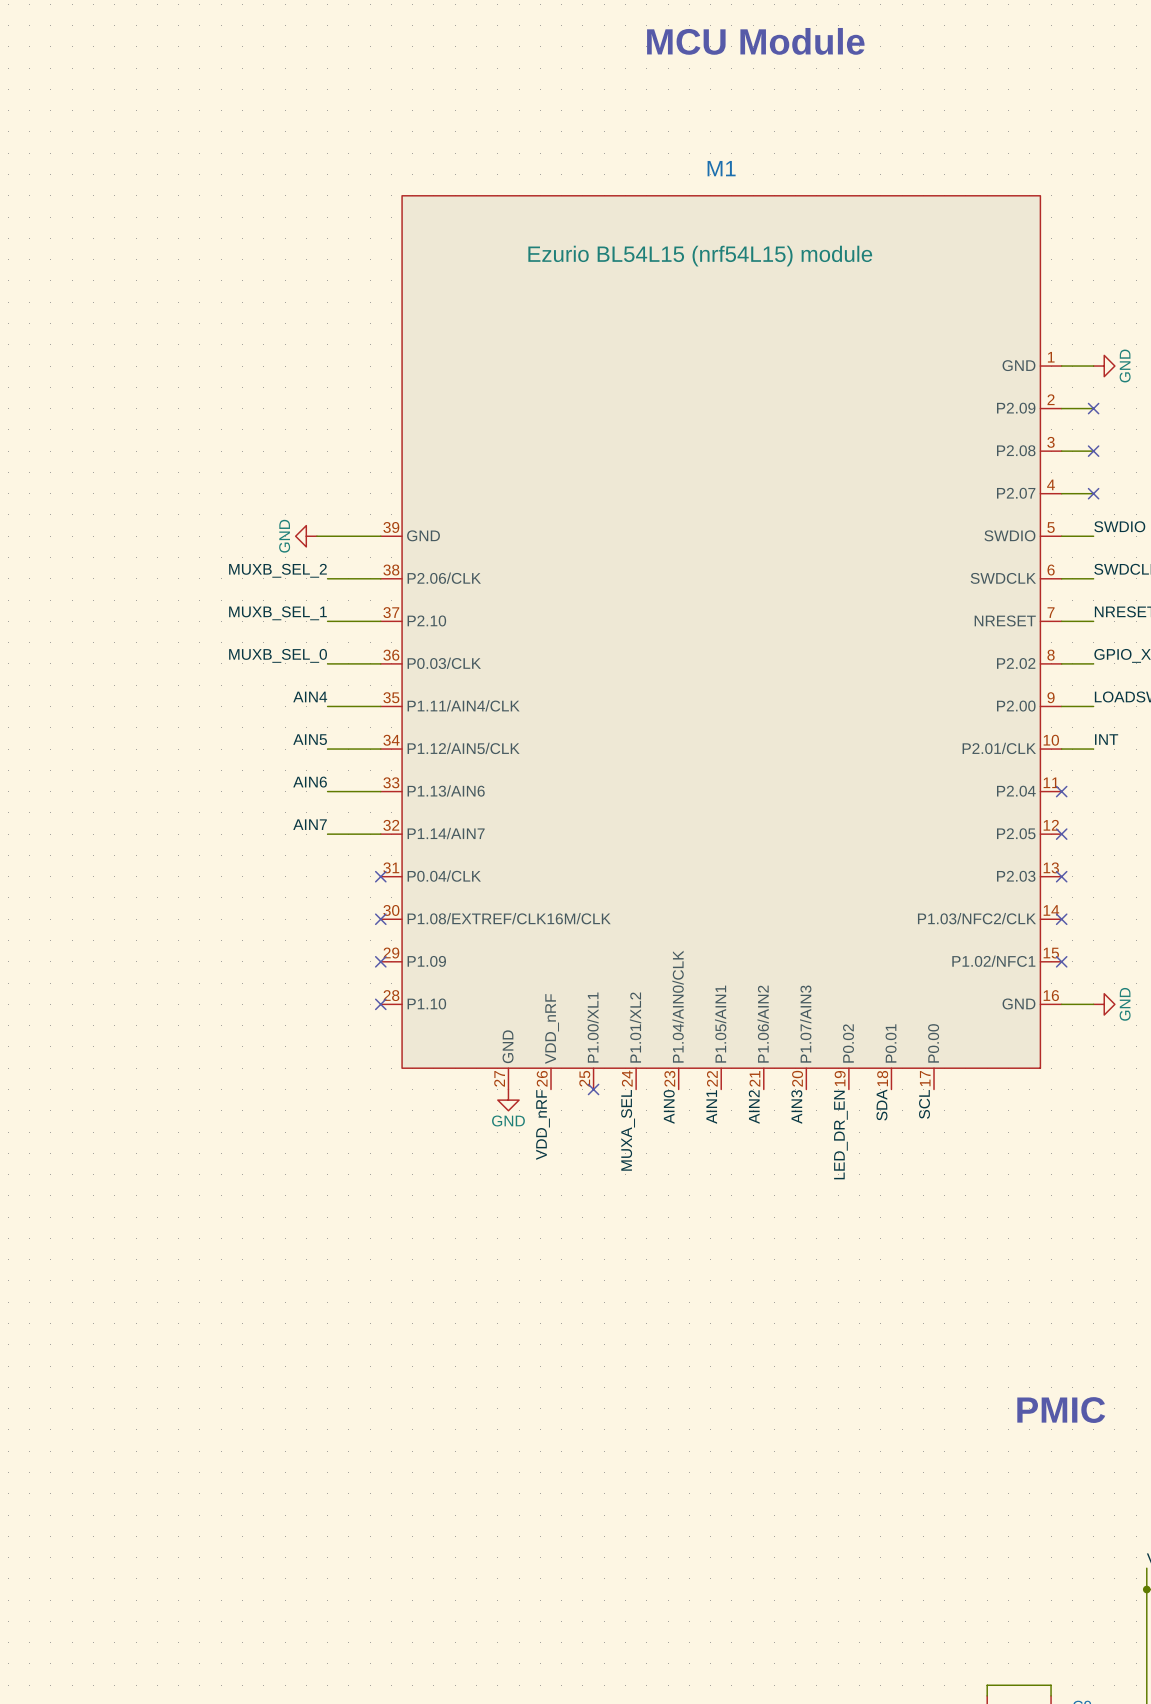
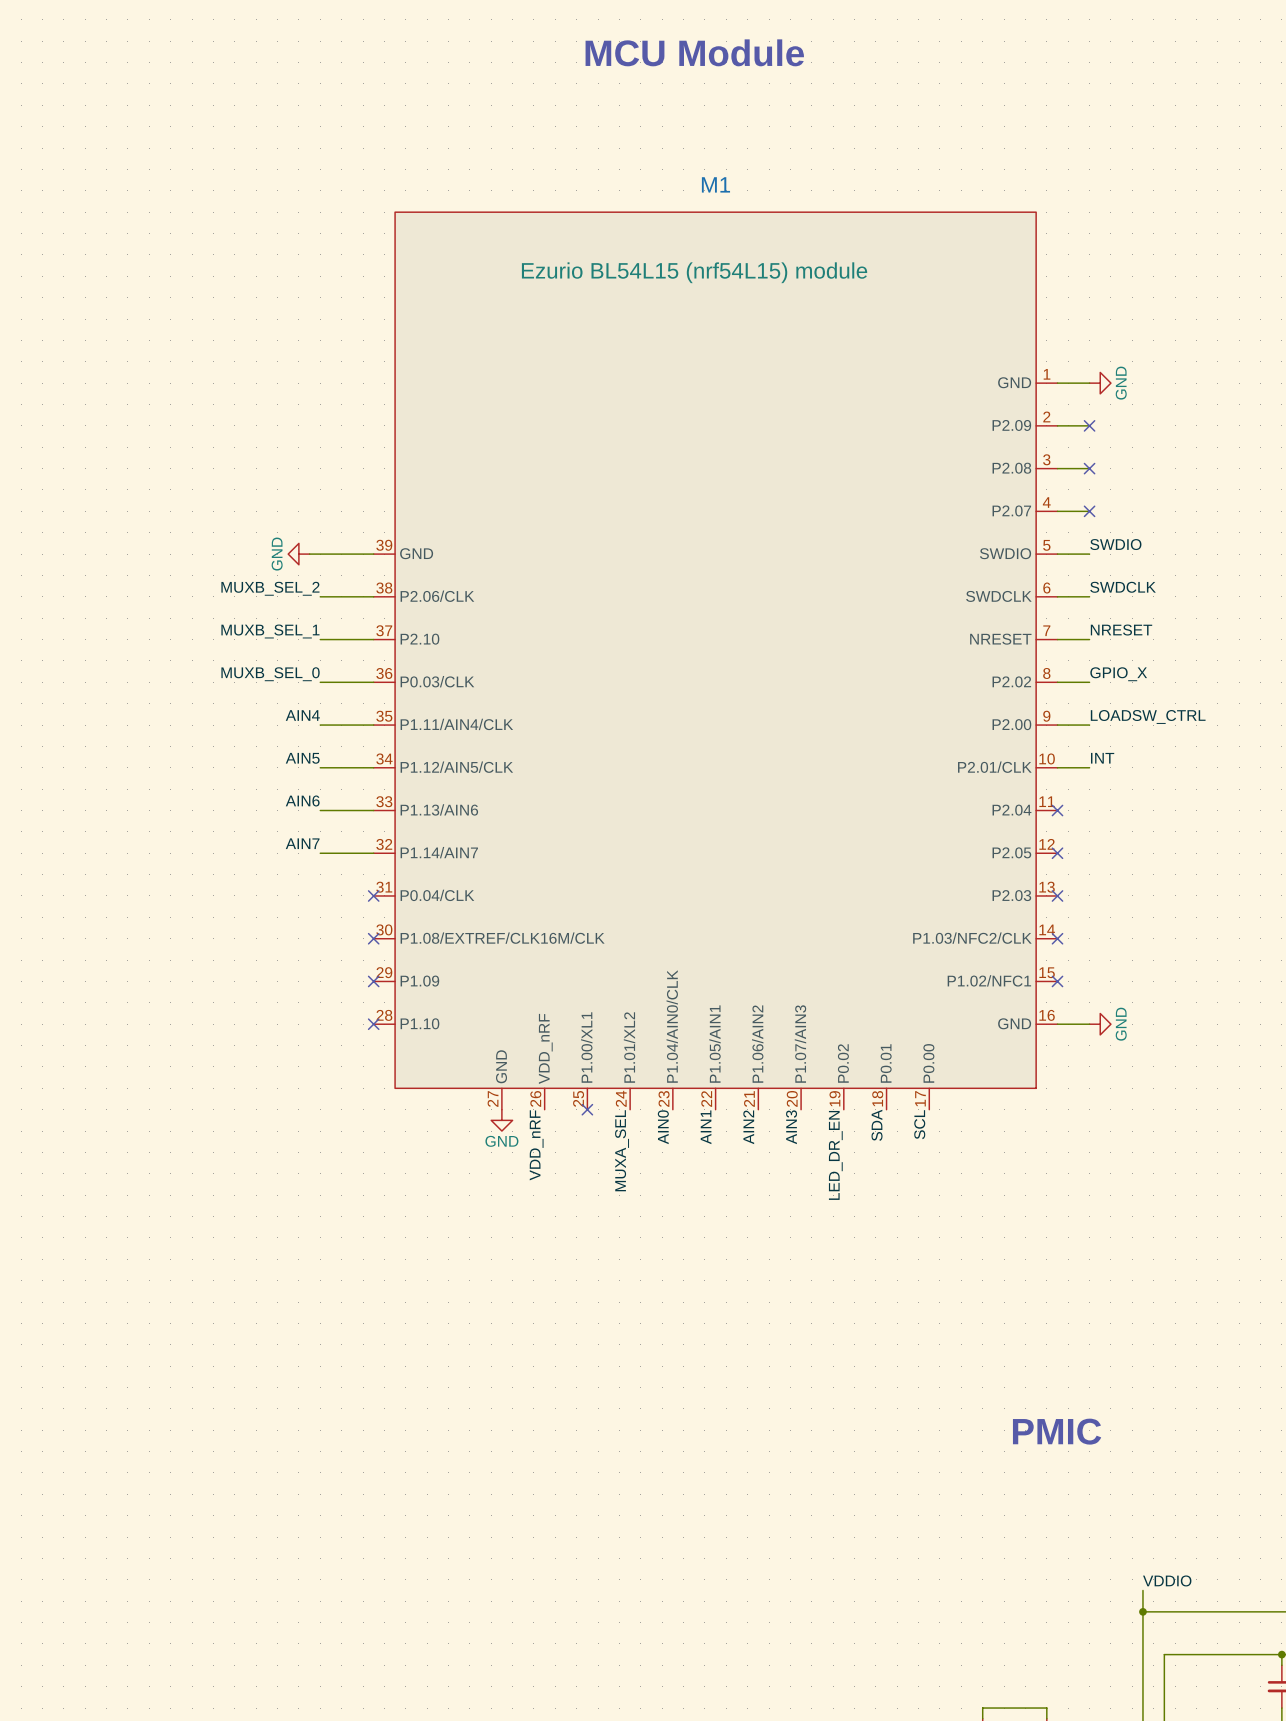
text position: MCU Module (755, 41) -> MCU Module (694, 52)

